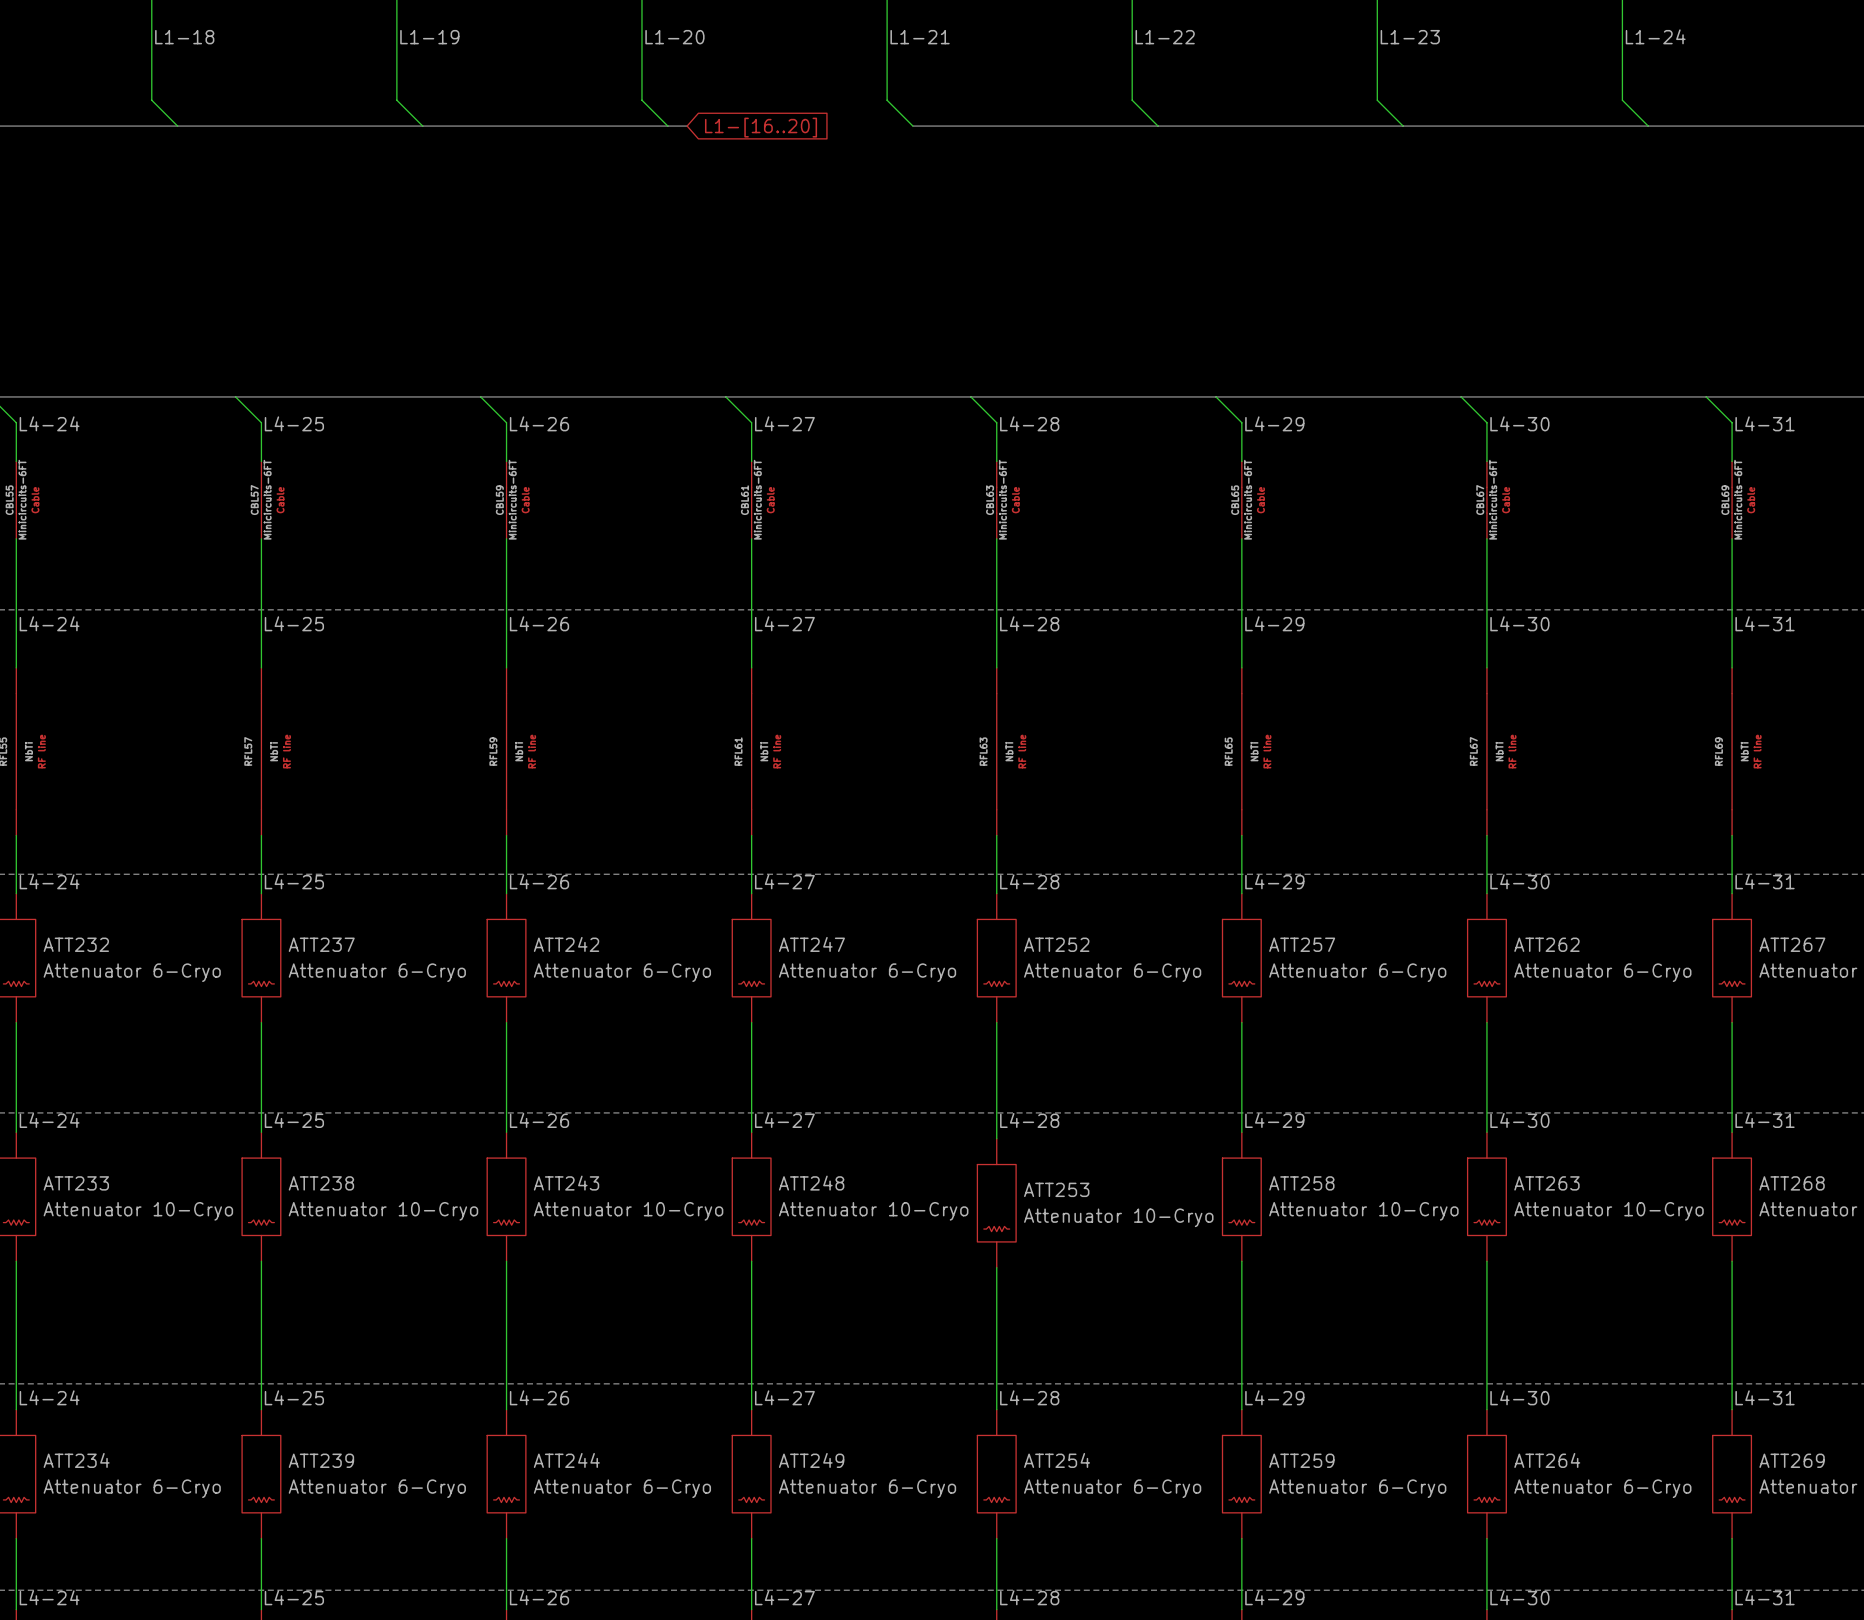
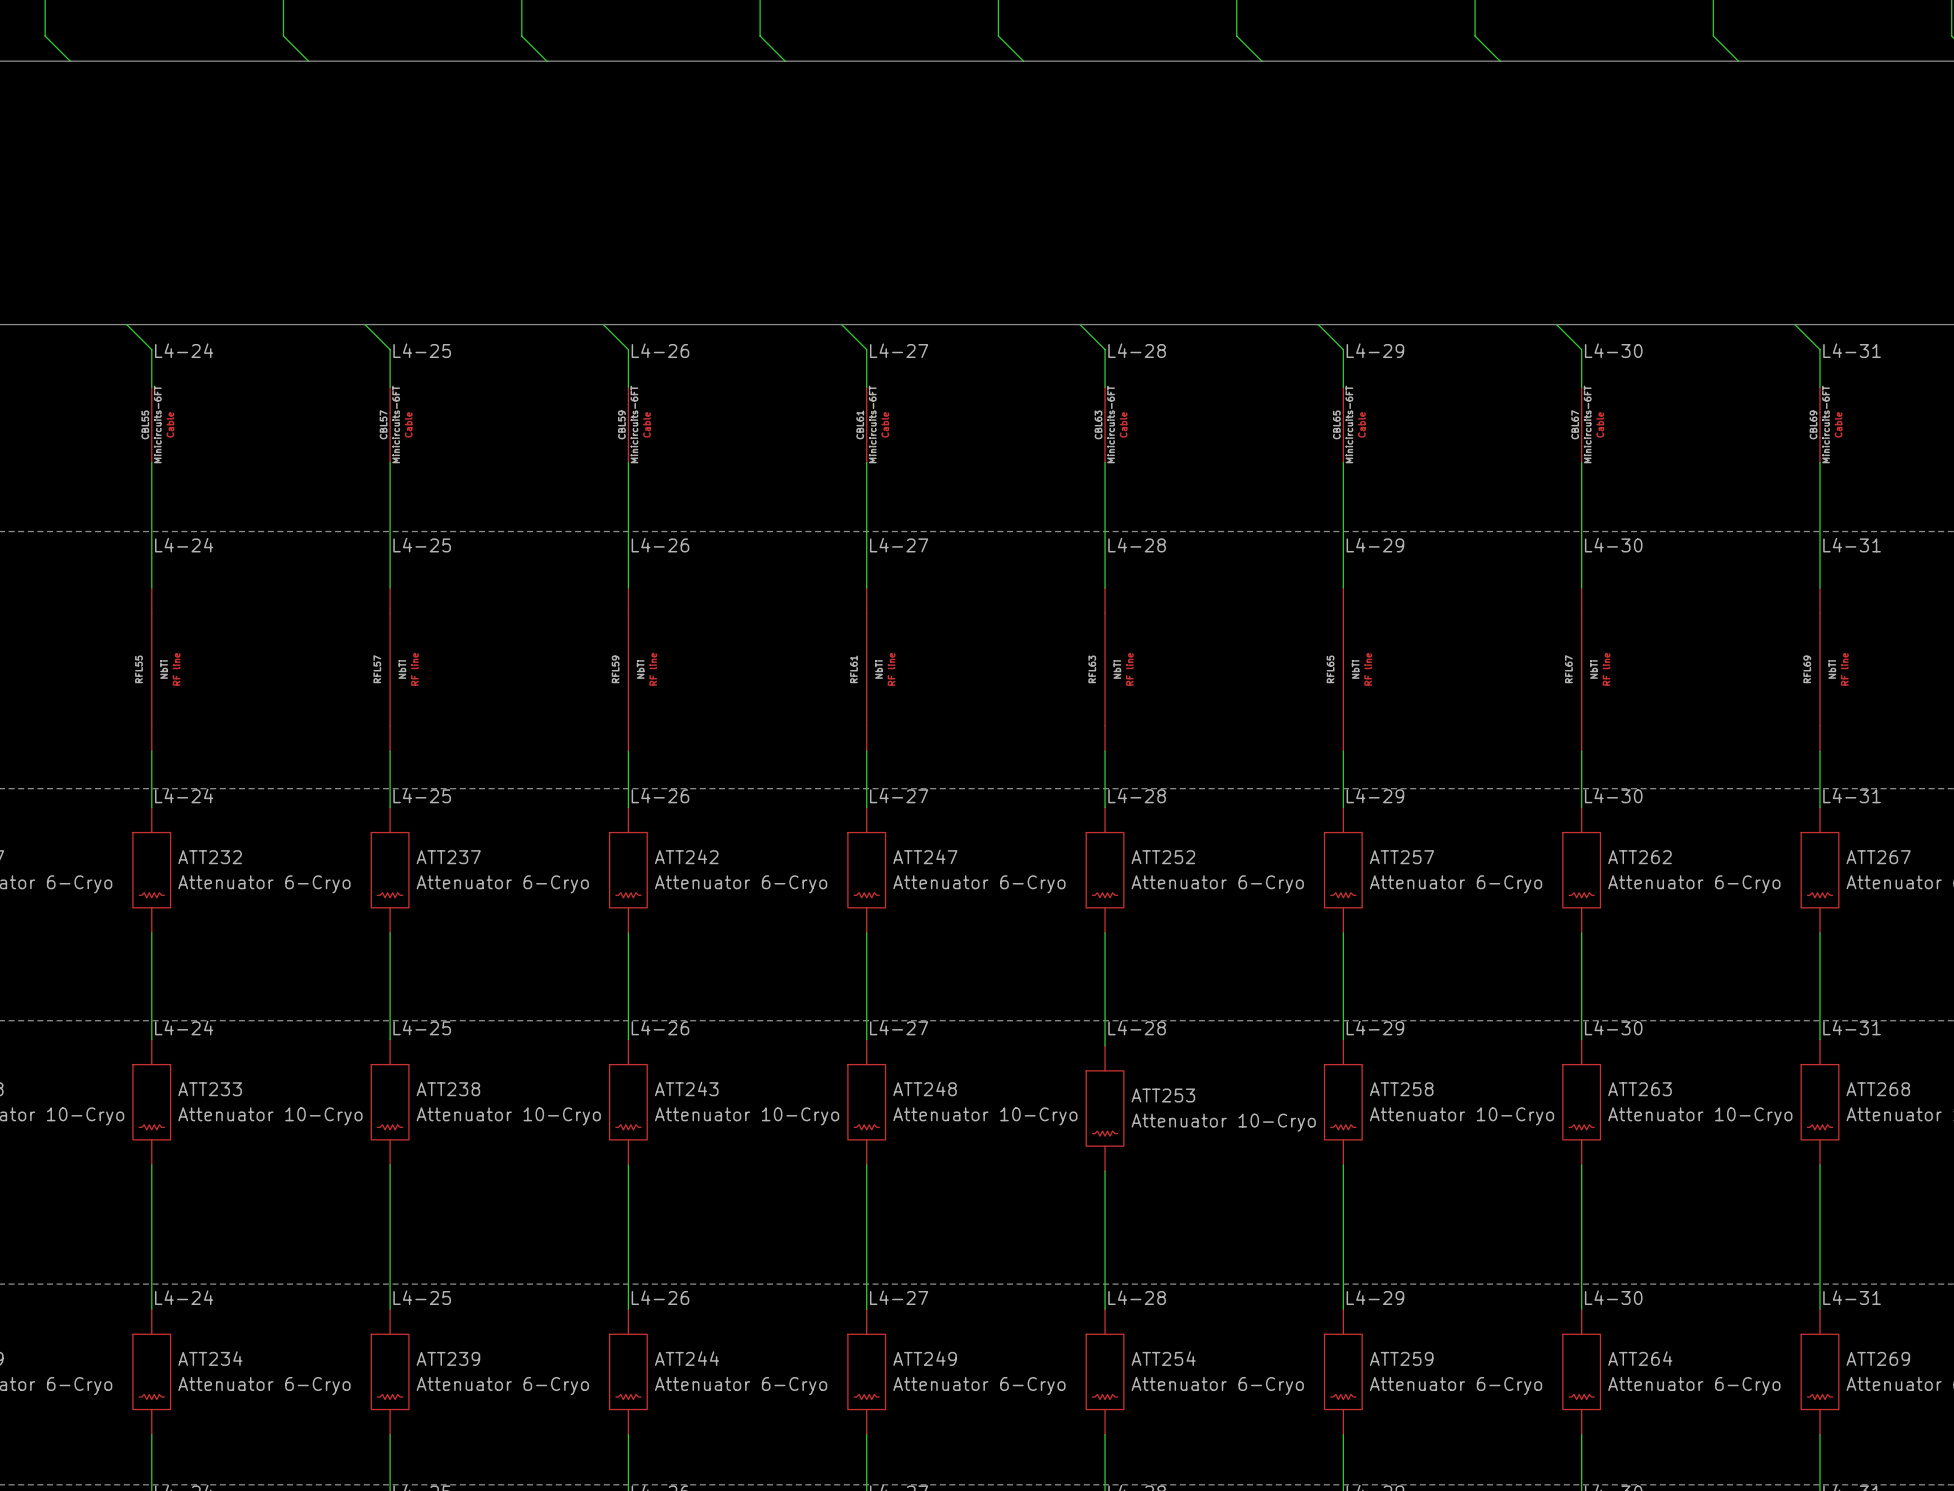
bus: none -> (804, 61) (1023, 61)
global label: L1-[16..20] (761, 127) -> none

